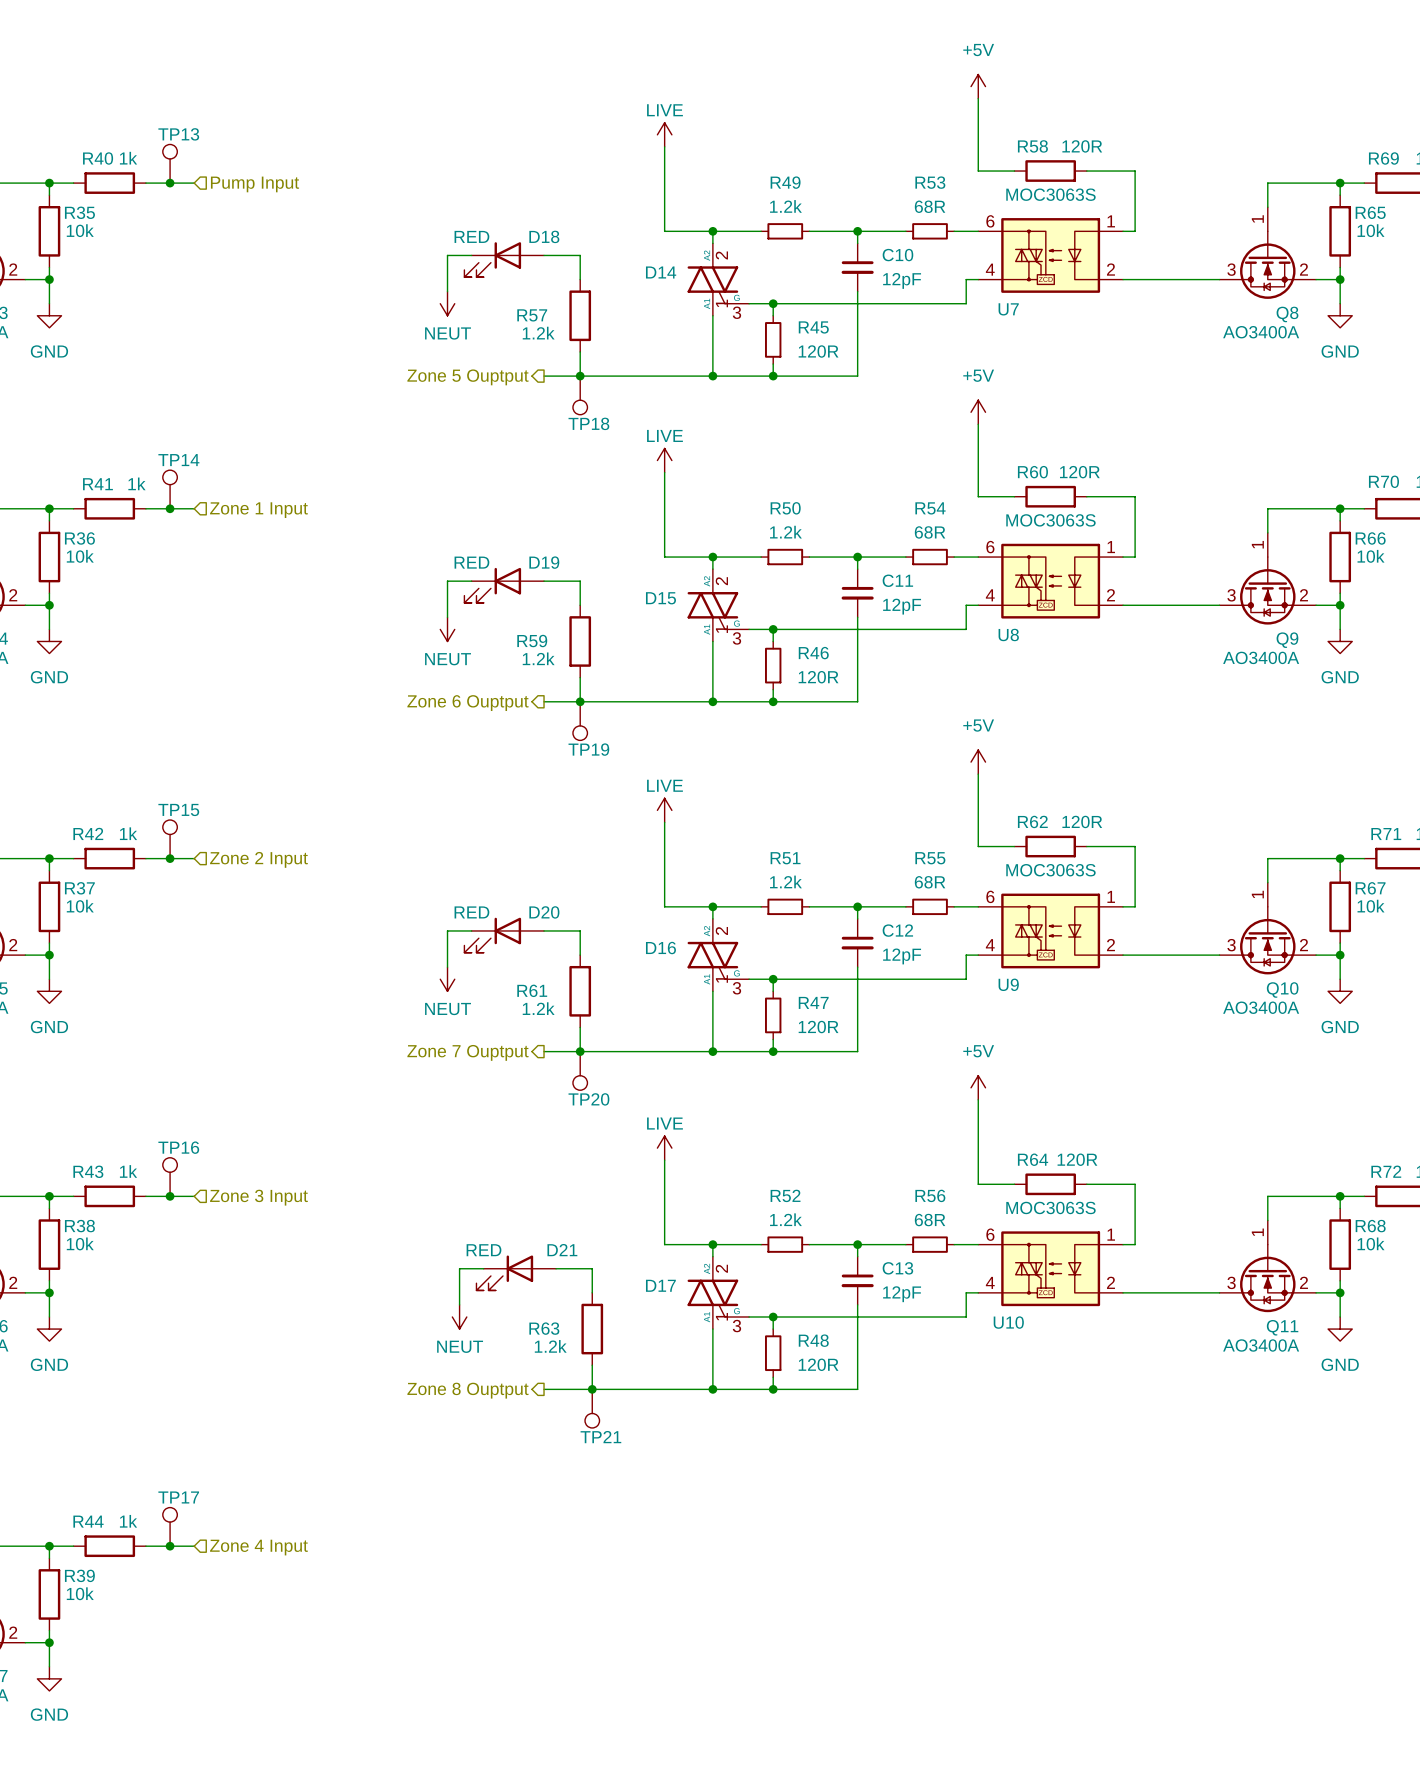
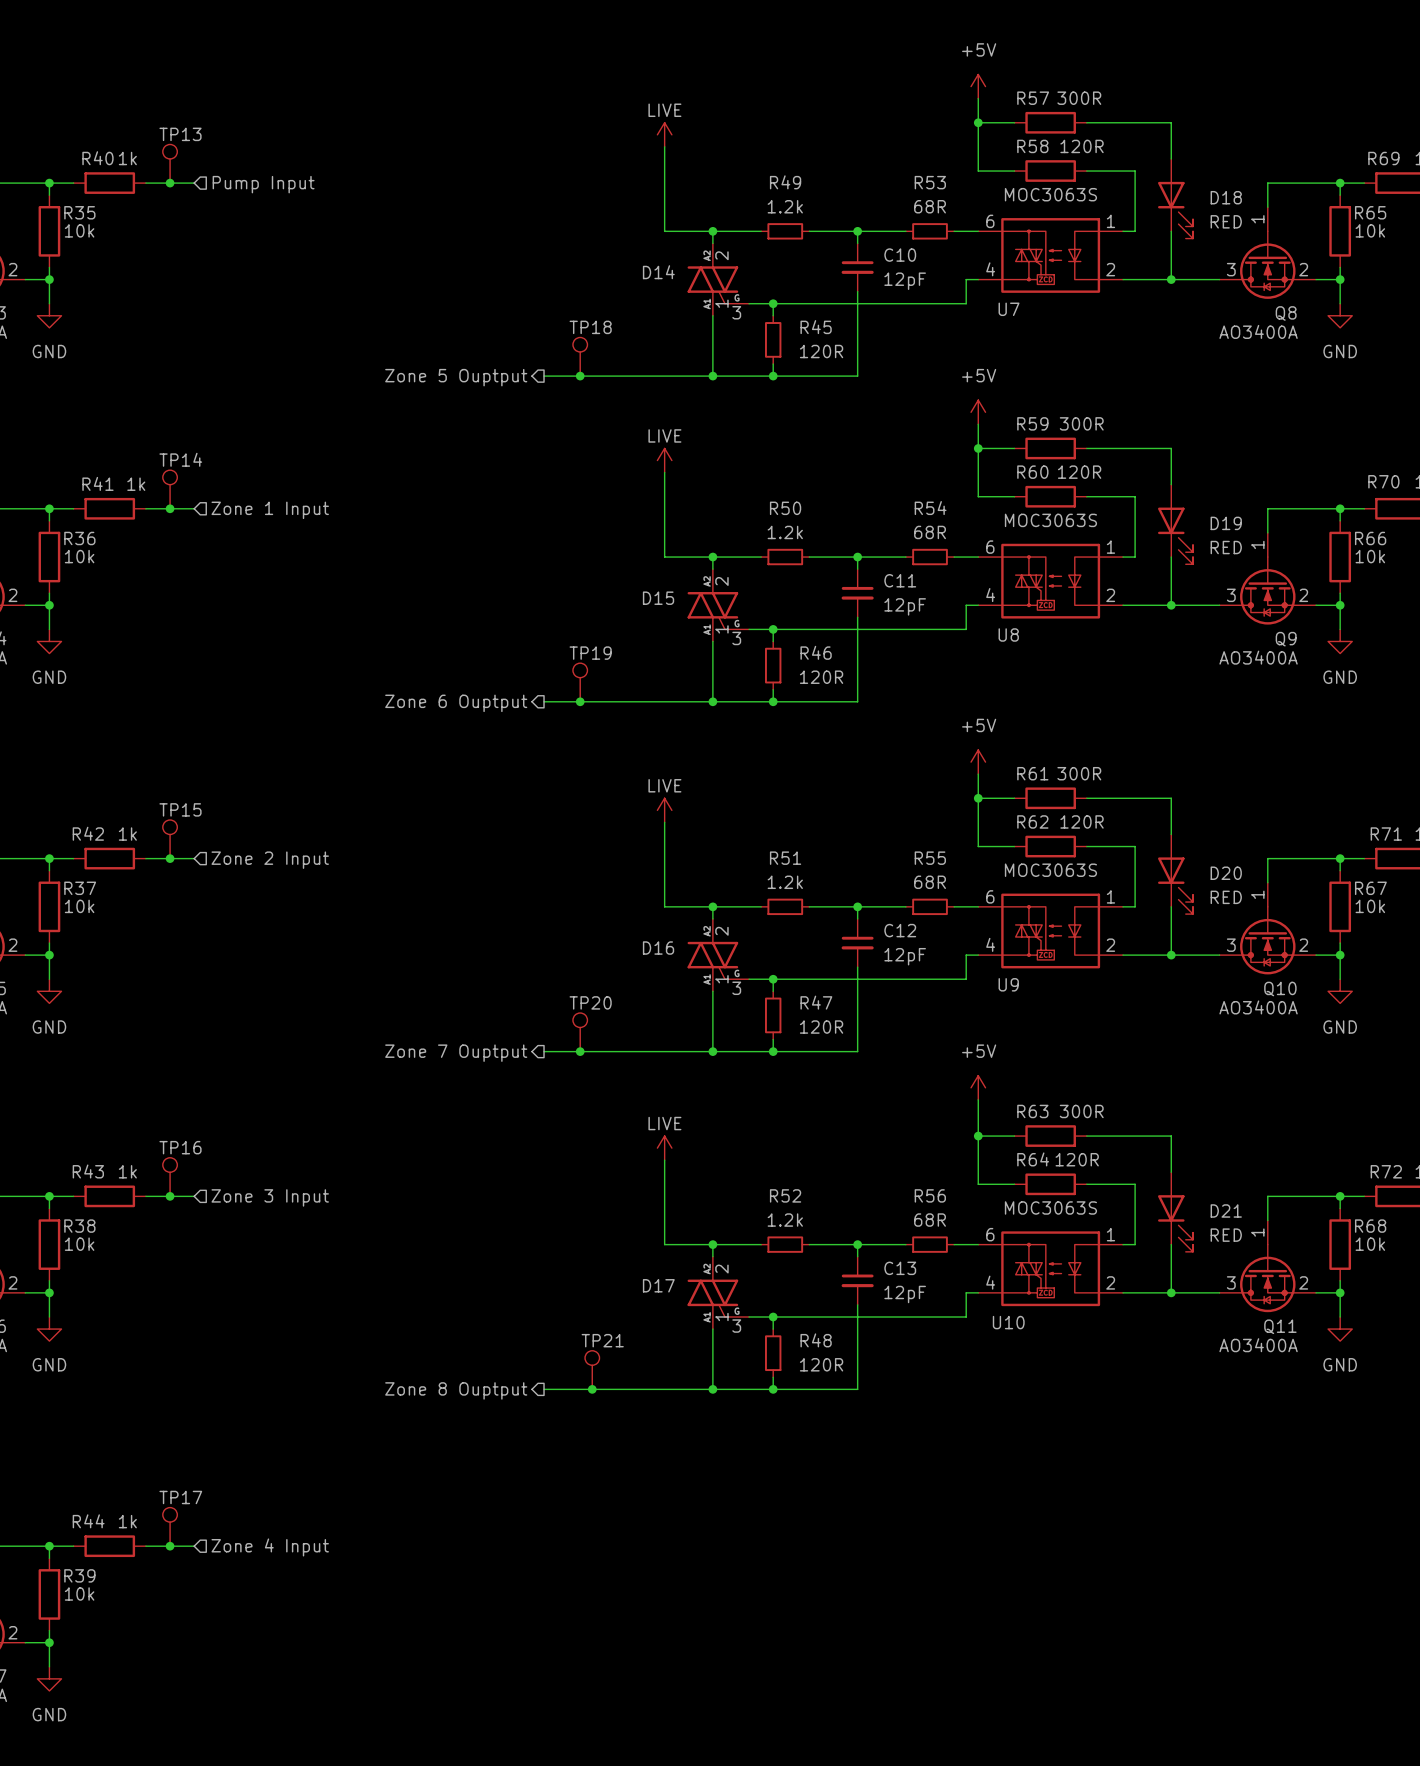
wire: none -> (978, 122) (1014, 122)
junction: none -> (978, 122)
wire: none -> (1086, 122) (1171, 122) (1171, 158)
wire: none -> (1171, 231) (1171, 279)
D18 value position: RED (471, 236) -> RED (1226, 221)
D18 name position: D18 (544, 236) -> D18 (1226, 197)
wire: (471, 255) (447, 255) (447, 291) -> none
wire: (544, 255) (580, 255) (580, 279) -> none
D18 rotation: 0° (492, 259) -> 90° counterclockwise (1175, 210)
D18 position: (504, 259) -> (1175, 198)
junction: none -> (1171, 279)
power symbol: NEUT (447, 303) -> none
R57 name position: R57 (532, 315) -> R57 (1033, 98)
R57 rotation: 0° (580, 315) -> 90° clockwise (1050, 122)
R57 position: (580, 315) -> (1050, 122)
R57 value: 1.2k (538, 333) -> 300R (1079, 98)
TP18 position: (580, 395) -> (580, 356)
TP18 rotation: 0° (580, 407) -> 180° (580, 344)
TP18 name position: TP18 (588, 423) -> TP18 (590, 327)
wire: none -> (978, 448) (1014, 448)
junction: none -> (978, 448)
wire: none -> (1086, 448) (1171, 448) (1171, 484)
wire: none -> (1171, 557) (1171, 605)
D19 value position: RED (471, 562) -> RED (1226, 547)
D19 name position: D19 (544, 562) -> D19 (1226, 523)
wire: (471, 581) (447, 581) (447, 617) -> none
wire: (544, 581) (580, 581) (580, 605) -> none
D19 rotation: 0° (492, 585) -> 90° counterclockwise (1175, 535)
D19 position: (504, 585) -> (1175, 524)
junction: none -> (1171, 605)
power symbol: NEUT (447, 629) -> none
R59 name position: R59 (532, 641) -> R59 (1032, 423)
R59 rotation: 0° (580, 641) -> 90° clockwise (1050, 448)
R59 position: (580, 641) -> (1050, 448)
R59 value: 1.2k (538, 658) -> 300R (1081, 423)
TP19 position: (580, 721) -> (580, 682)
TP19 rotation: 0° (580, 733) -> 180° (580, 670)
TP19 name position: TP19 (588, 749) -> TP19 (590, 653)
wire: none -> (978, 798) (1014, 798)
junction: none -> (978, 798)
wire: none -> (1086, 798) (1171, 798) (1171, 834)
wire: none -> (1171, 906) (1171, 955)
D20 value position: RED (471, 912) -> RED (1226, 897)
D20 name position: D20 (544, 912) -> D20 (1226, 873)
wire: (471, 930) (447, 930) (447, 967) -> none
wire: (544, 930) (580, 930) (580, 955) -> none
D20 rotation: 0° (492, 935) -> 90° counterclockwise (1175, 885)
D20 position: (504, 935) -> (1175, 874)
junction: none -> (1171, 955)
power symbol: NEUT (447, 979) -> none
R61 name position: R61 (532, 990) -> R61 (1032, 773)
R61 rotation: 0° (580, 991) -> 90° clockwise (1050, 798)
R61 position: (580, 991) -> (1050, 798)
R61 value: 1.2k (538, 1008) -> 300R (1079, 773)
TP20 position: (580, 1070) -> (580, 1032)
TP20 rotation: 0° (580, 1082) -> 180° (580, 1020)
TP20 name position: TP20 (588, 1099) -> TP20 (590, 1002)
wire: none -> (978, 1136) (1014, 1136)
junction: none -> (978, 1136)
wire: none -> (1086, 1136) (1171, 1136) (1171, 1172)
wire: none -> (1171, 1244) (1171, 1292)
D21 value position: RED (484, 1250) -> RED (1226, 1235)
D21 name position: D21 (562, 1250) -> D21 (1226, 1210)
wire: (483, 1268) (459, 1268) (459, 1304) -> none
wire: (556, 1268) (592, 1268) (592, 1292) -> none
D21 rotation: 0° (504, 1272) -> 90° counterclockwise (1175, 1223)
D21 position: (516, 1272) -> (1175, 1212)
junction: none -> (1171, 1292)
power symbol: NEUT (459, 1316) -> none
R63 name position: R63 (544, 1328) -> R63 (1032, 1111)
R63 rotation: 0° (592, 1329) -> 90° clockwise (1050, 1136)
R63 position: (592, 1329) -> (1050, 1136)
R63 value: 1.2k (550, 1346) -> 300R (1081, 1111)
TP21 position: (592, 1408) -> (592, 1370)
TP21 rotation: 0° (592, 1420) -> 180° (592, 1358)
TP21 name position: TP21 (600, 1437) -> TP21 (602, 1340)

